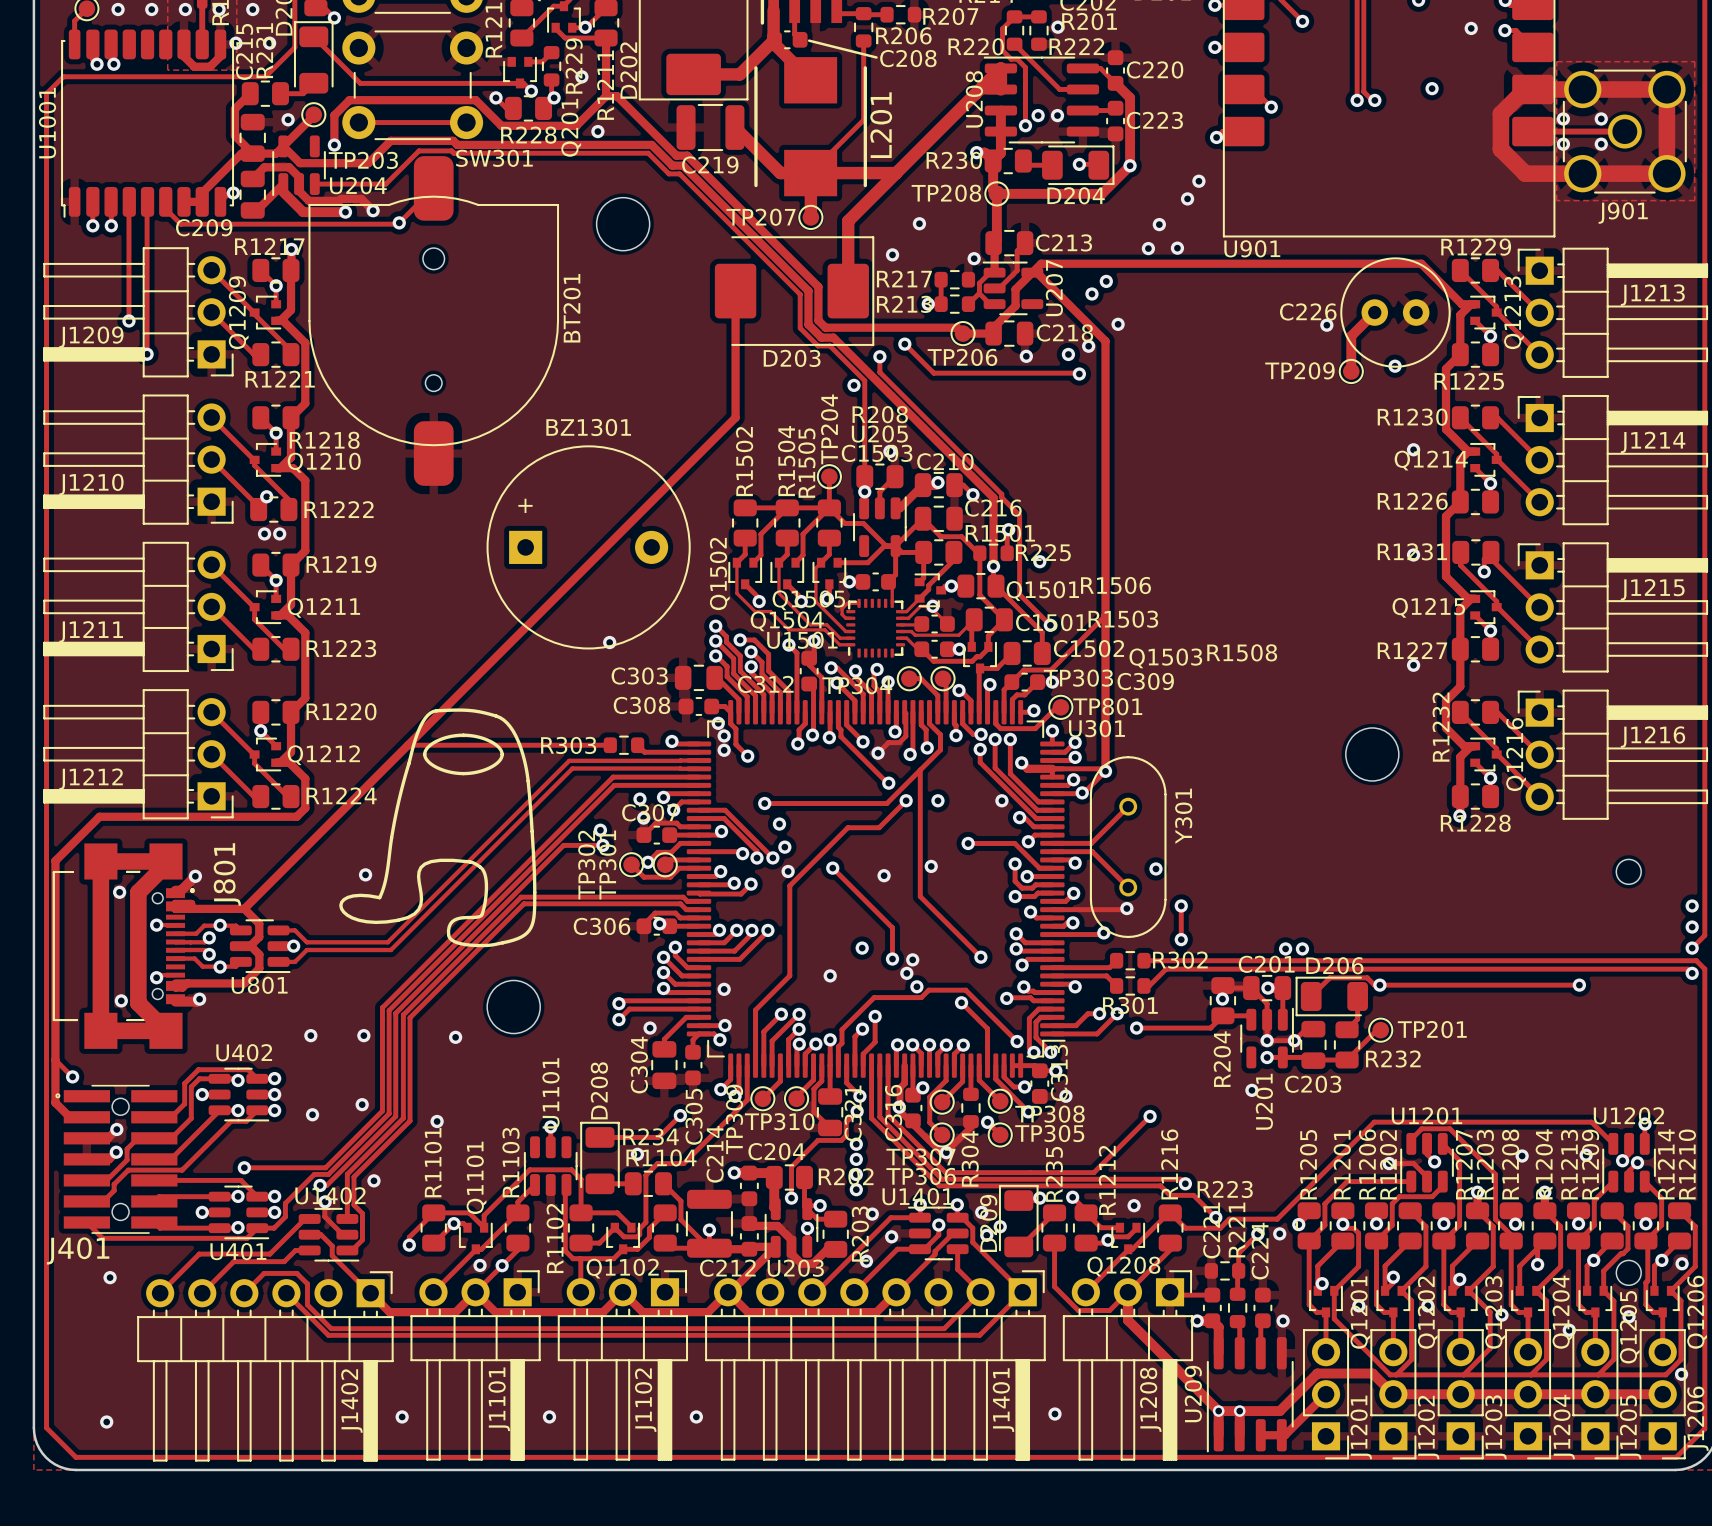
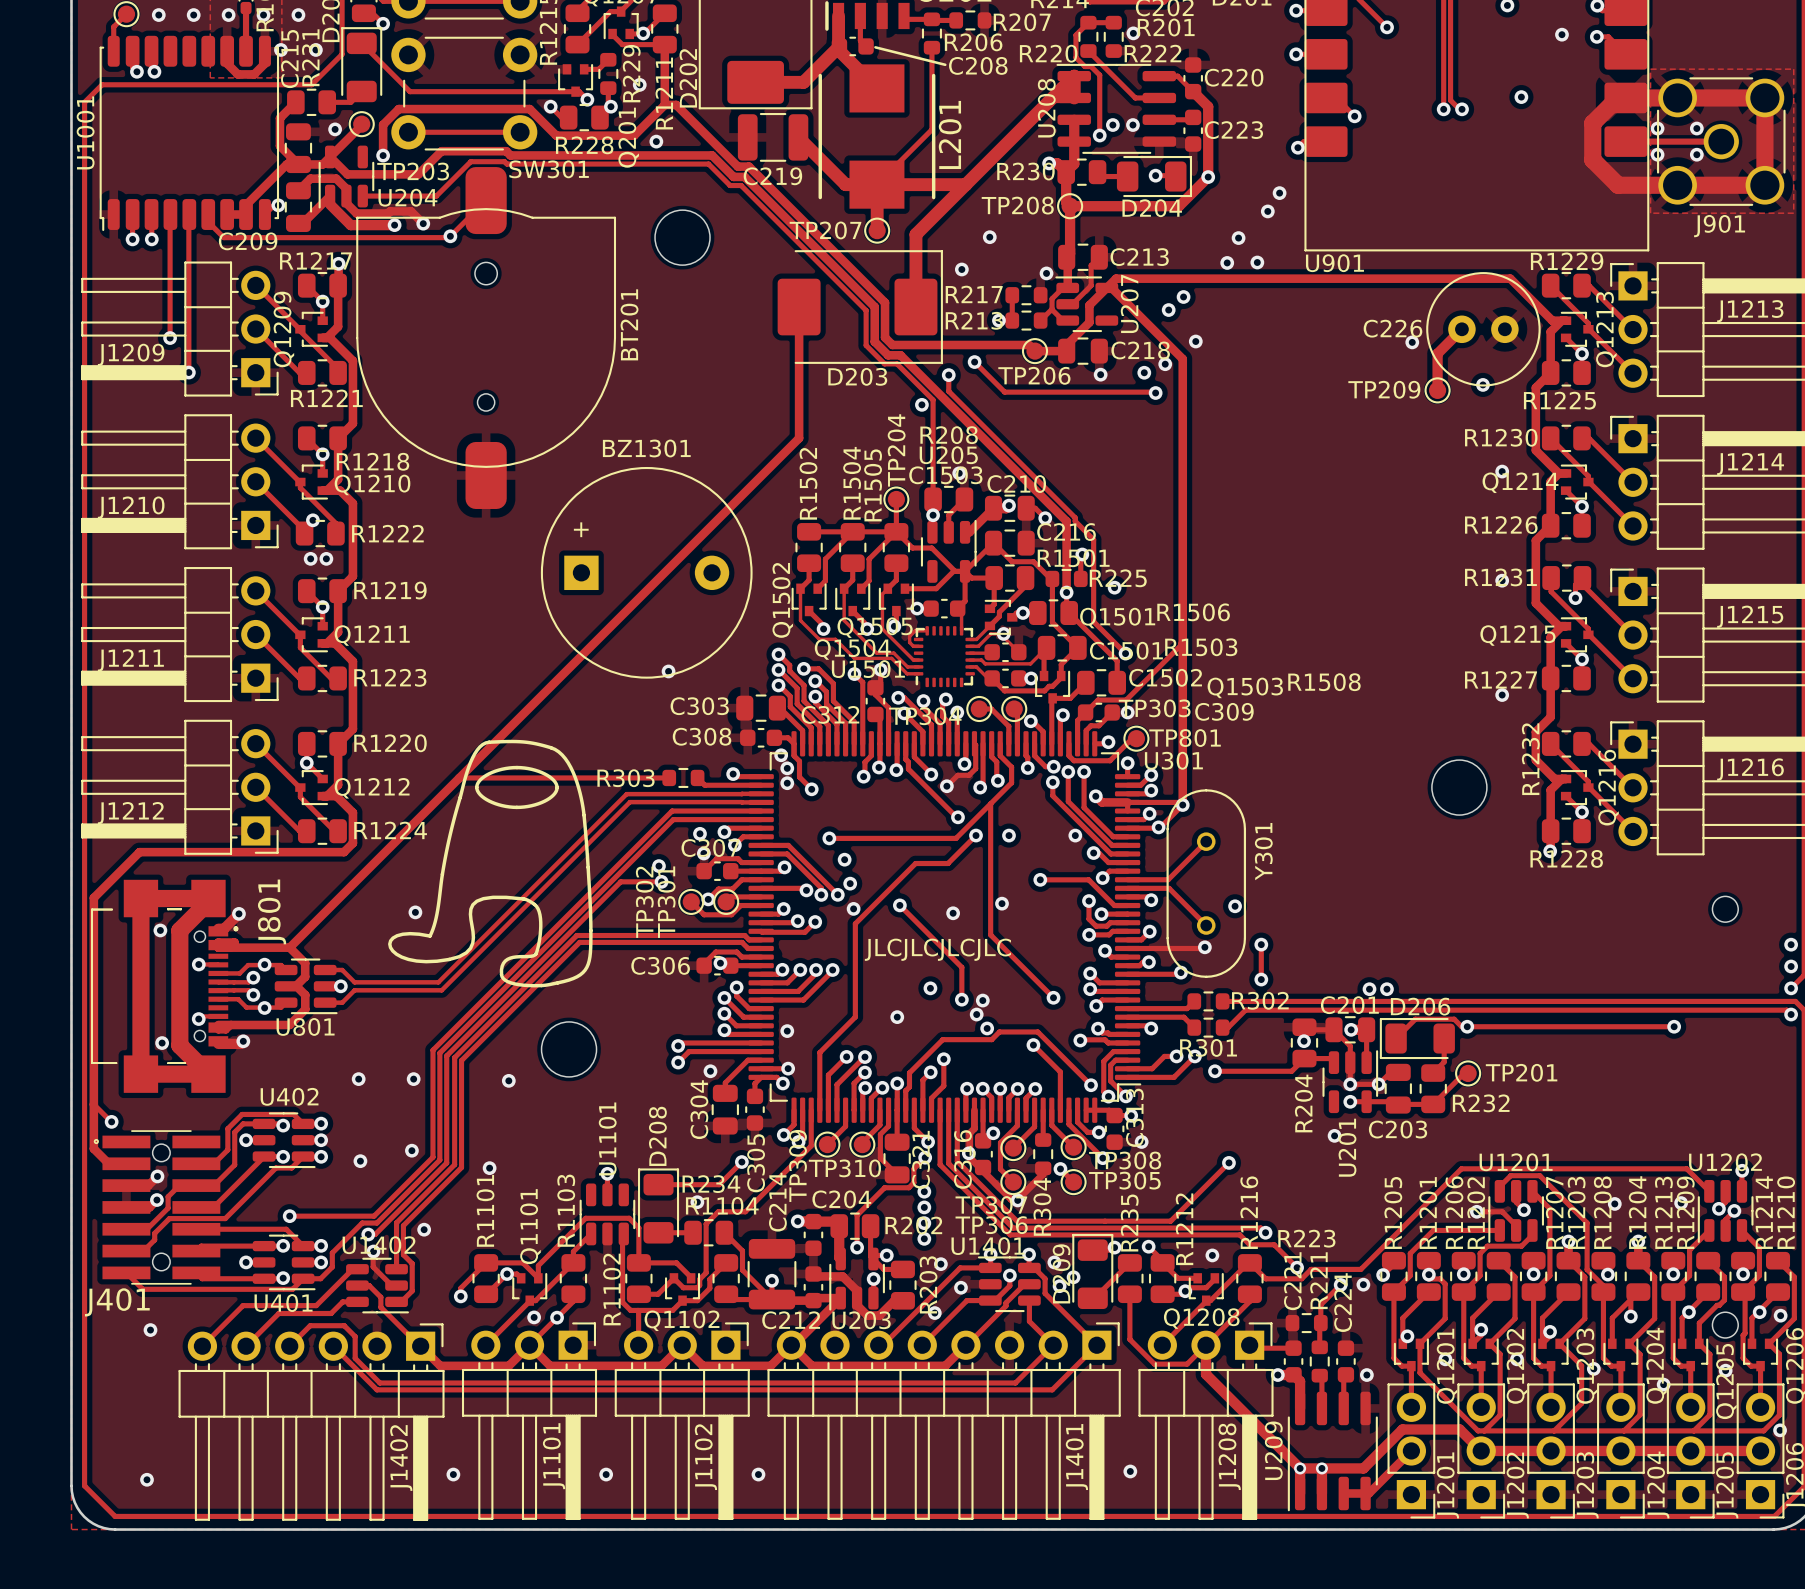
text: none -> JLCJLCJLCJLC (937, 949)

